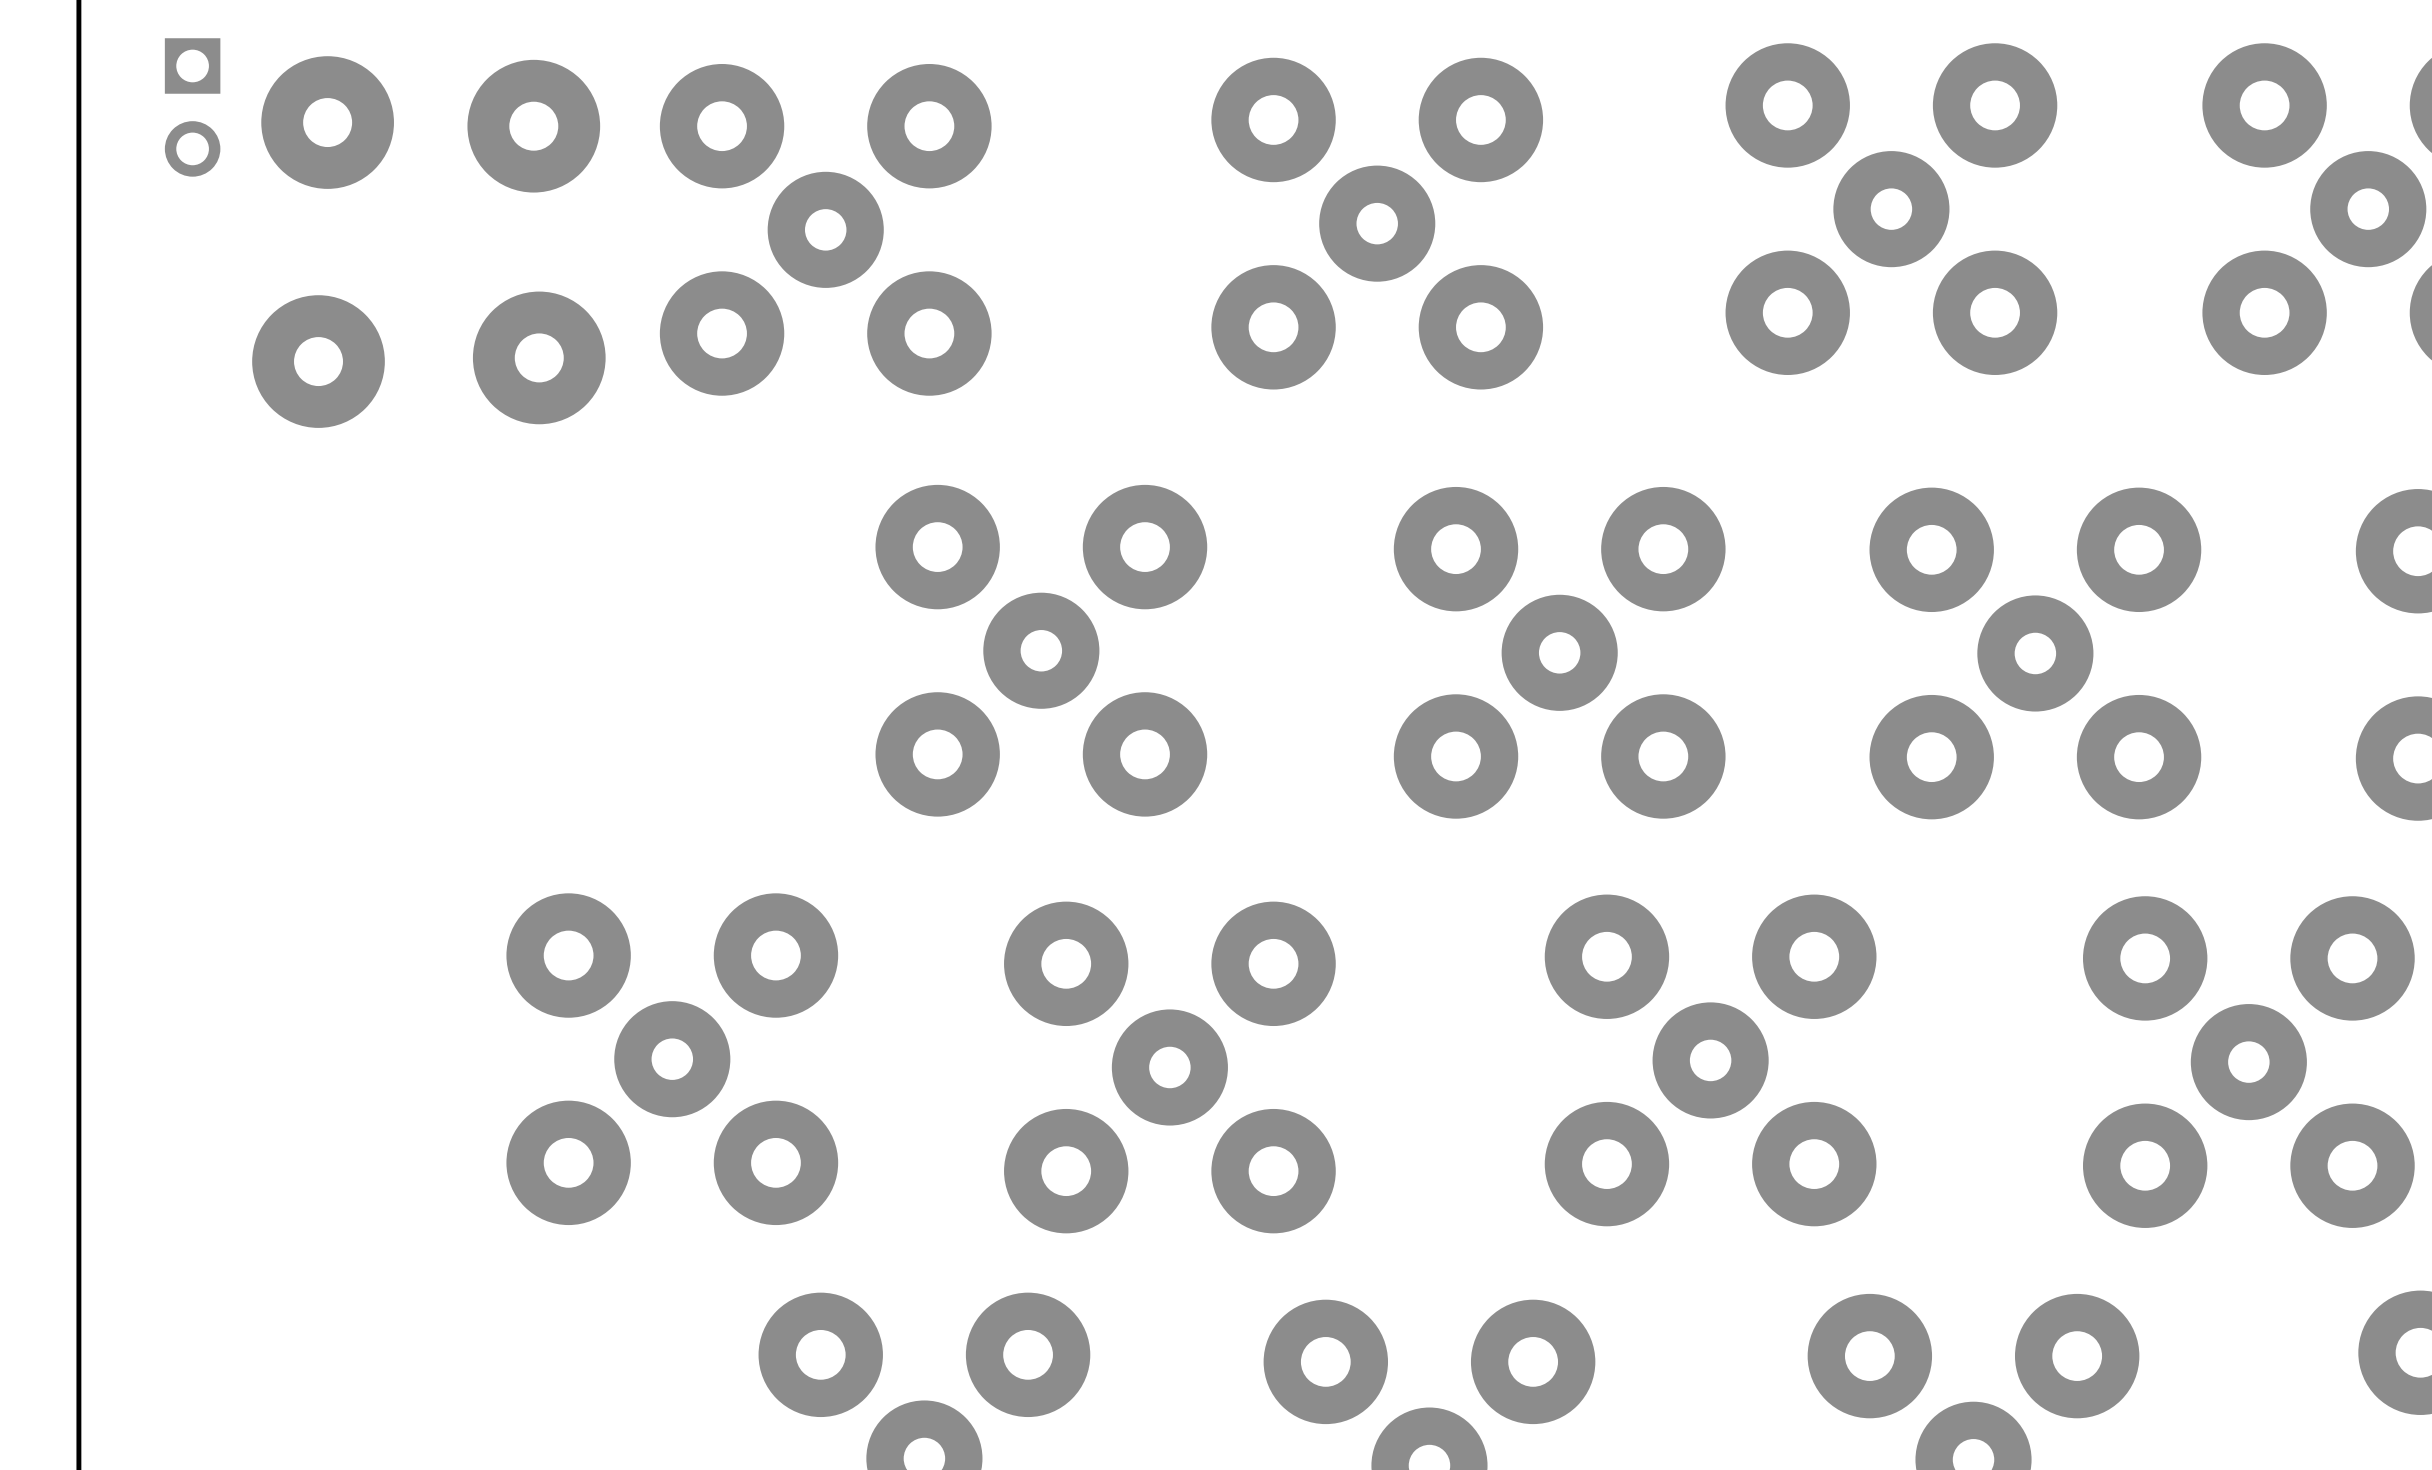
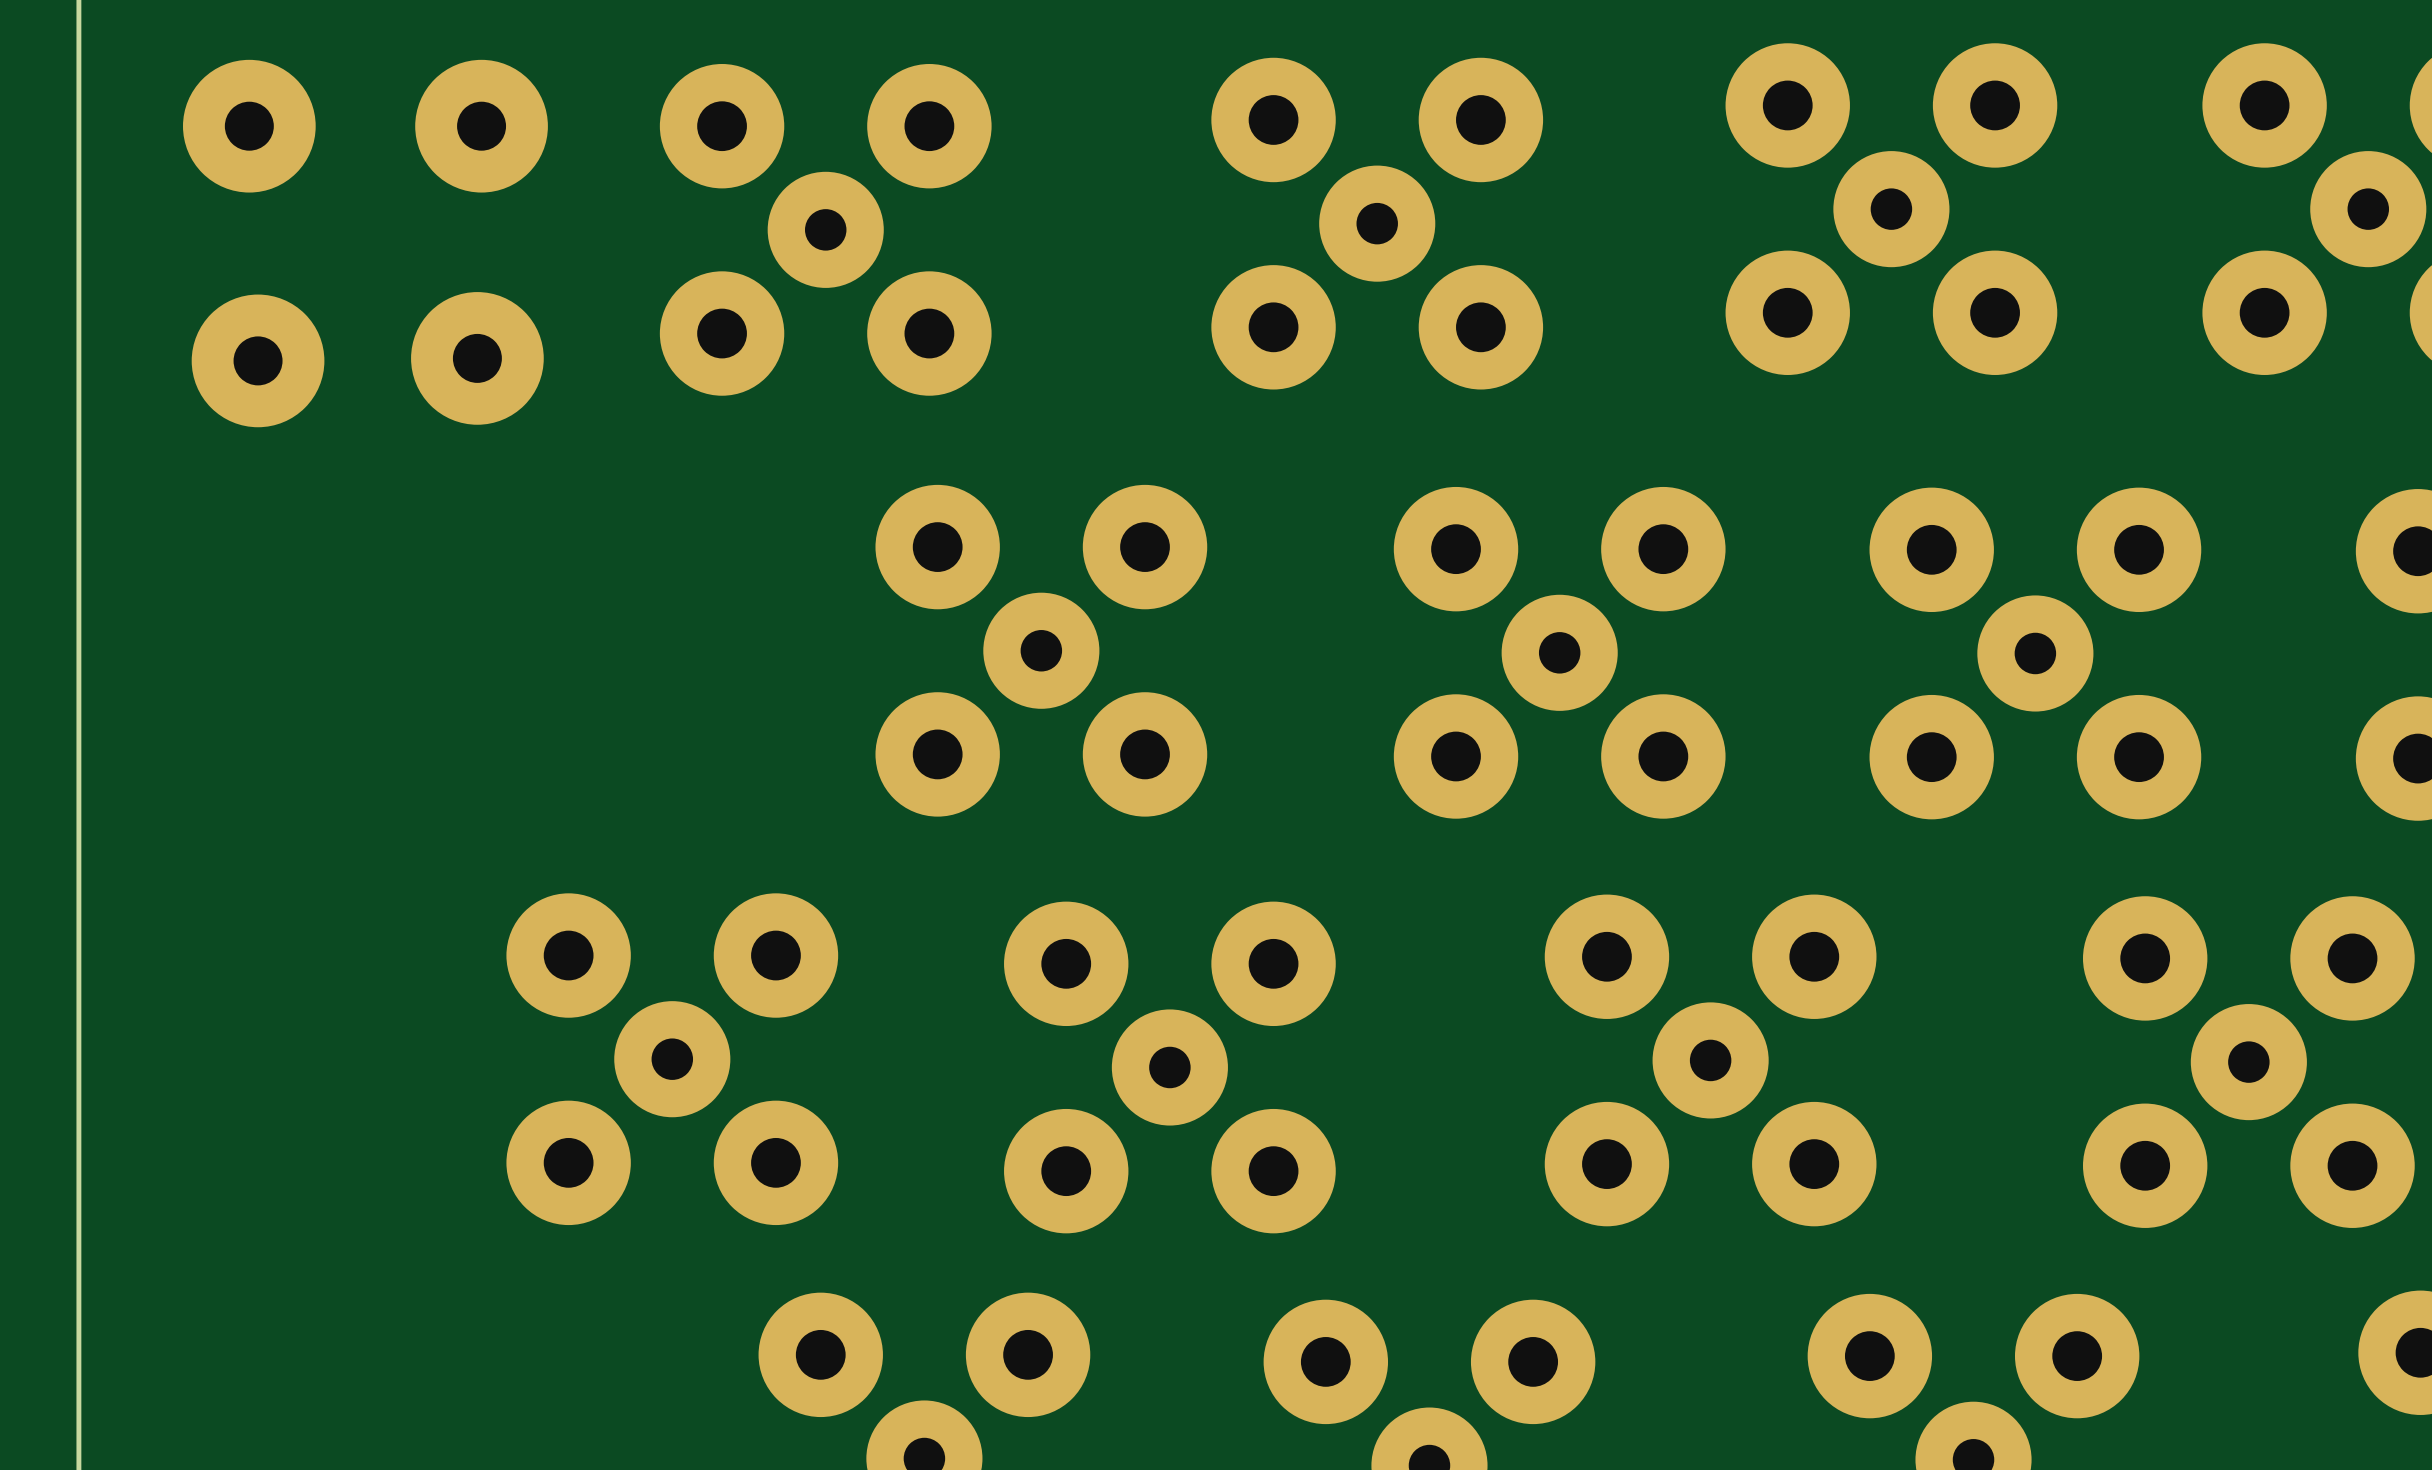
part: (192, 107) -> none
part: (327, 122) -> none
part: none -> (249, 126)
part position: (533, 126) -> (481, 126)
part position: (539, 357) -> (477, 358)
part position: (318, 361) -> (258, 360)

